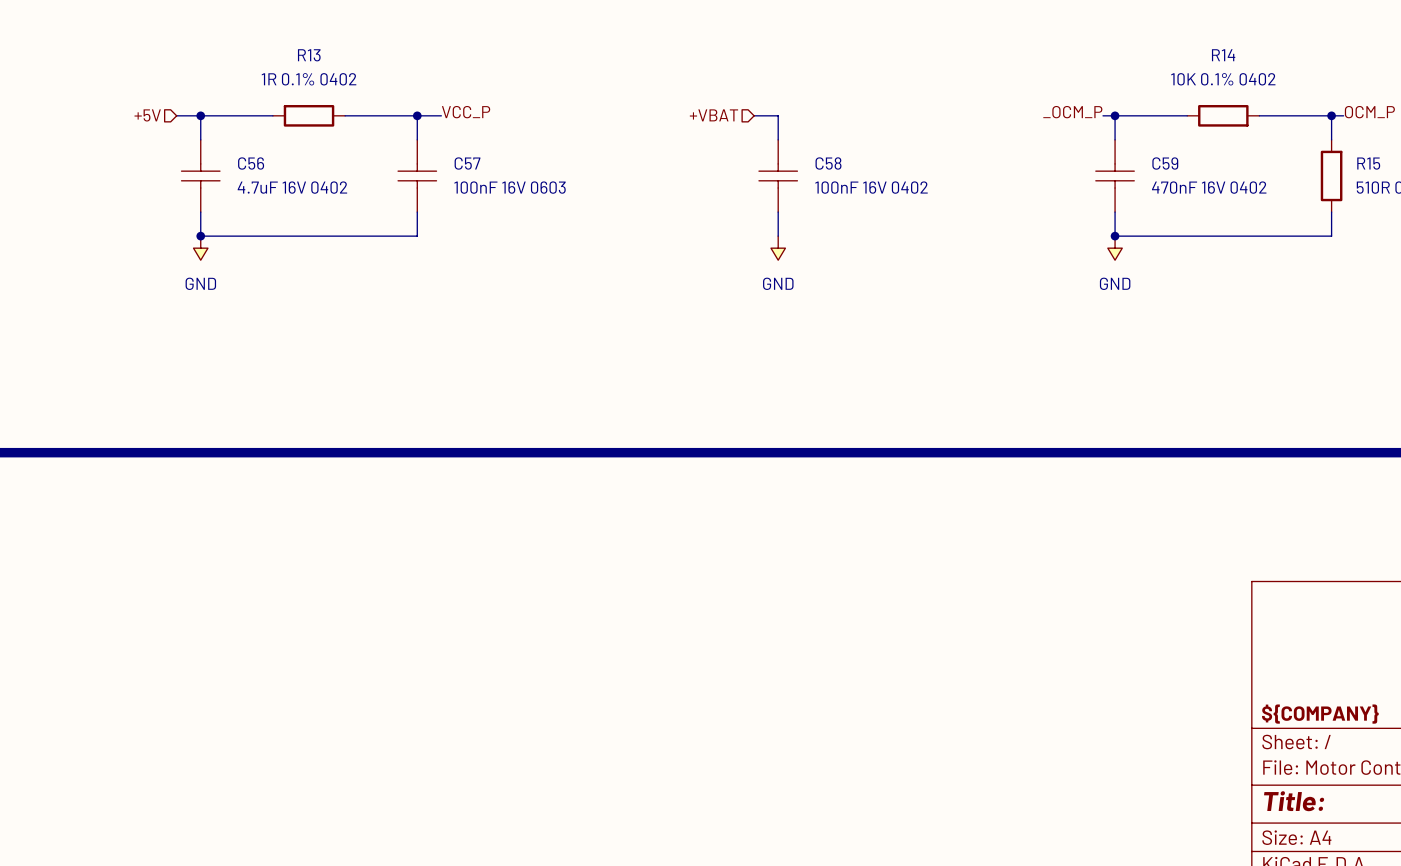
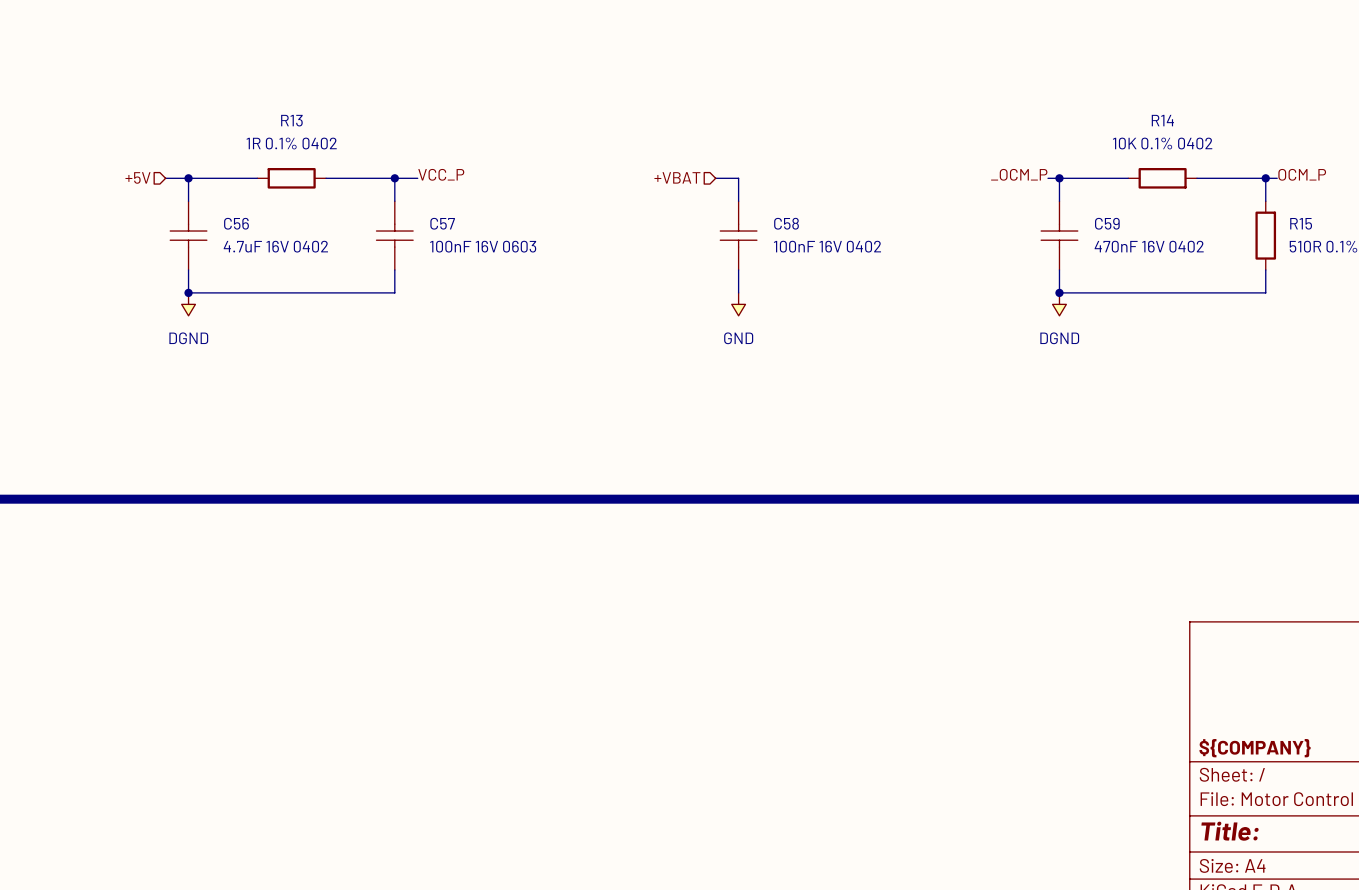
power symbol: GND (200, 248) -> DGND (188, 304)
power symbol: GND (1115, 248) -> DGND (1059, 304)

